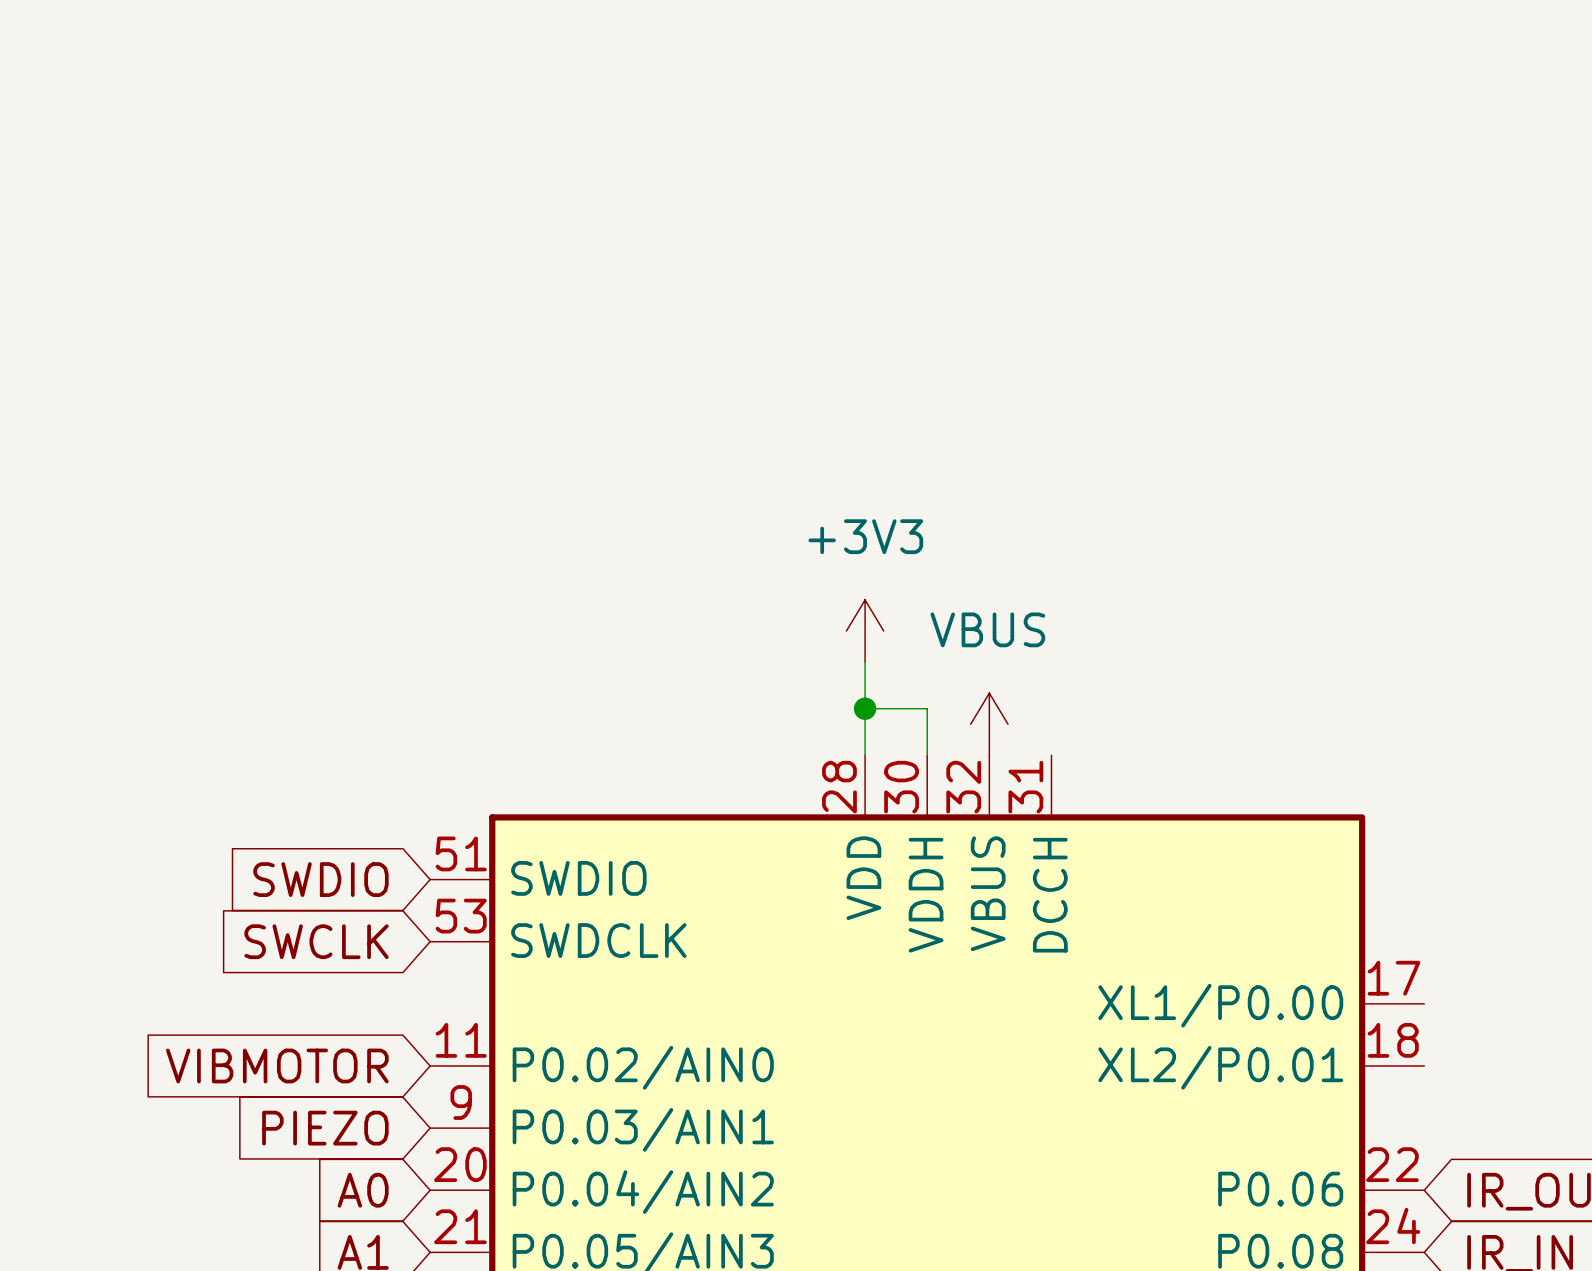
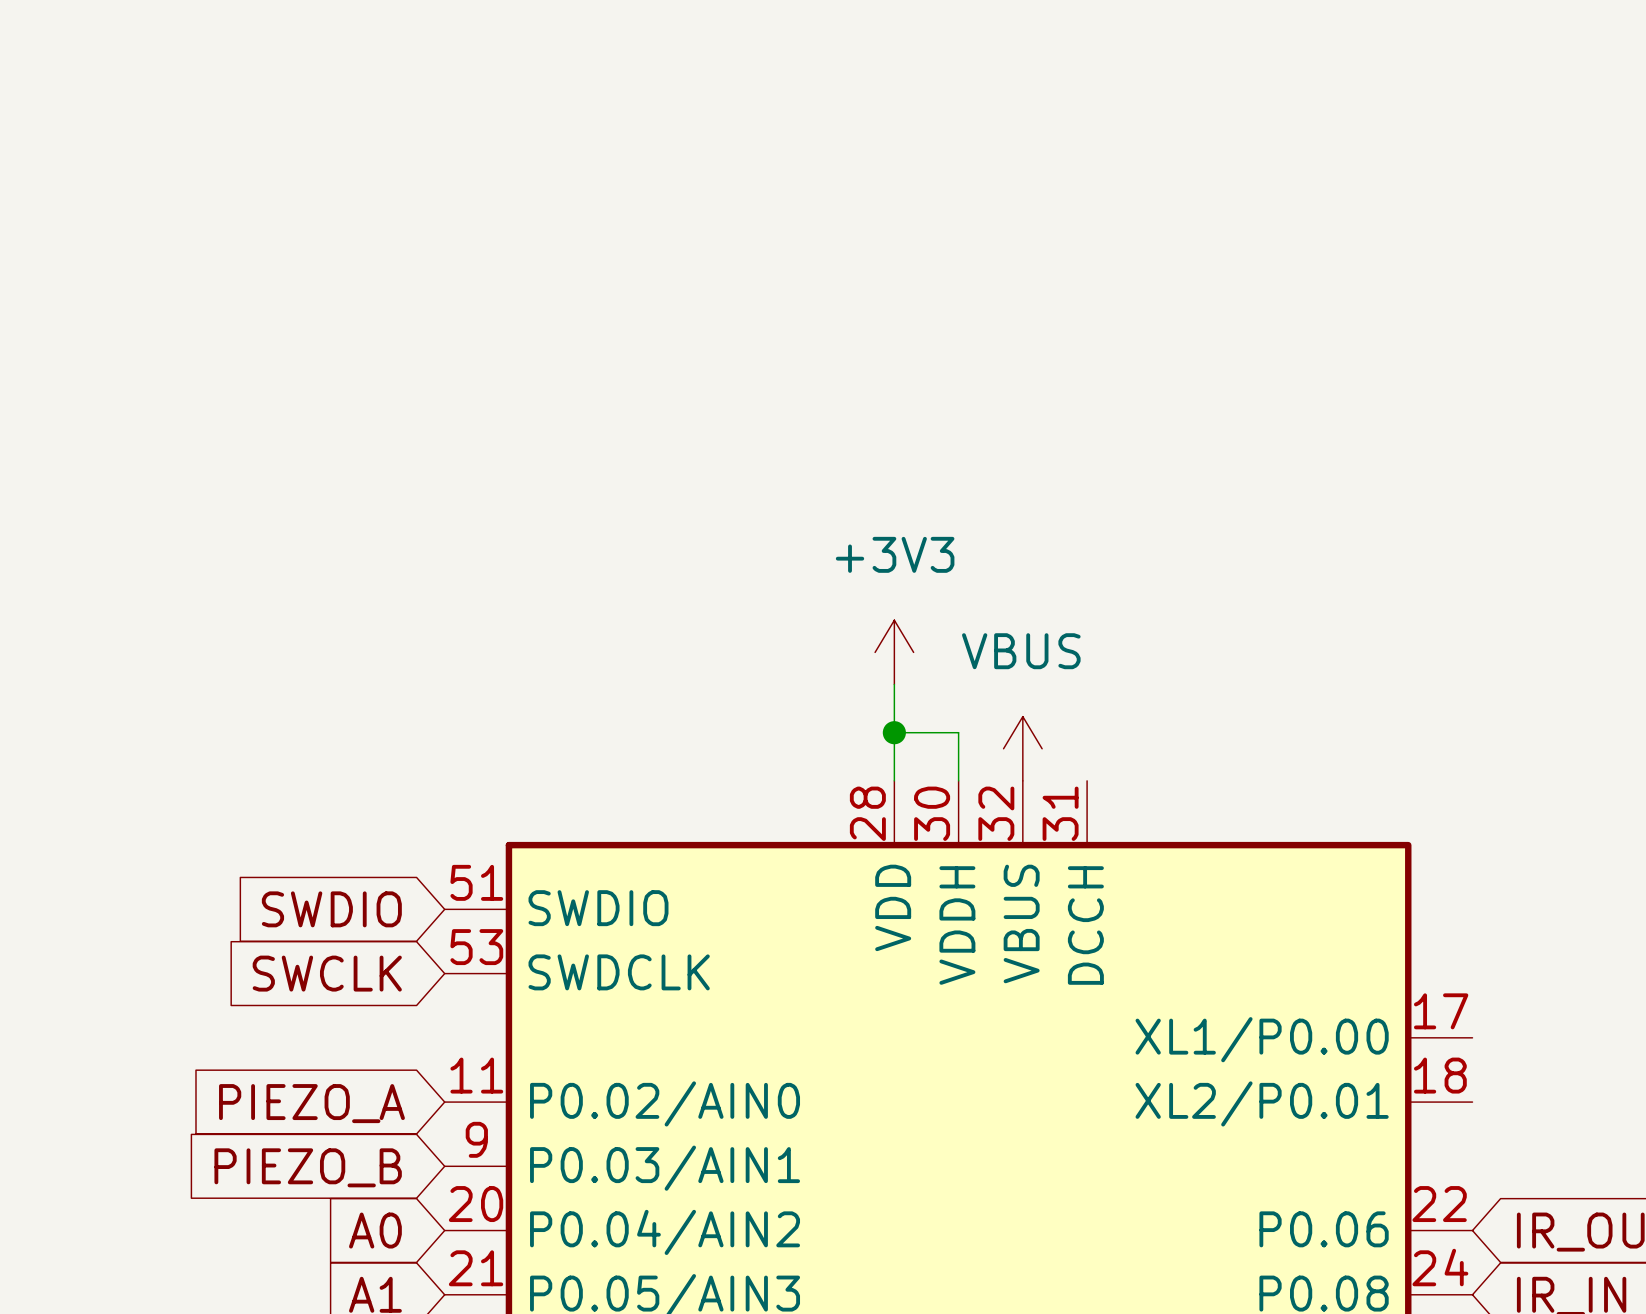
global label: VIBMOTOR (277, 1065) -> PIEZO_A (311, 1103)
global label: PIEZO (325, 1128) -> PIEZO_B (308, 1167)

